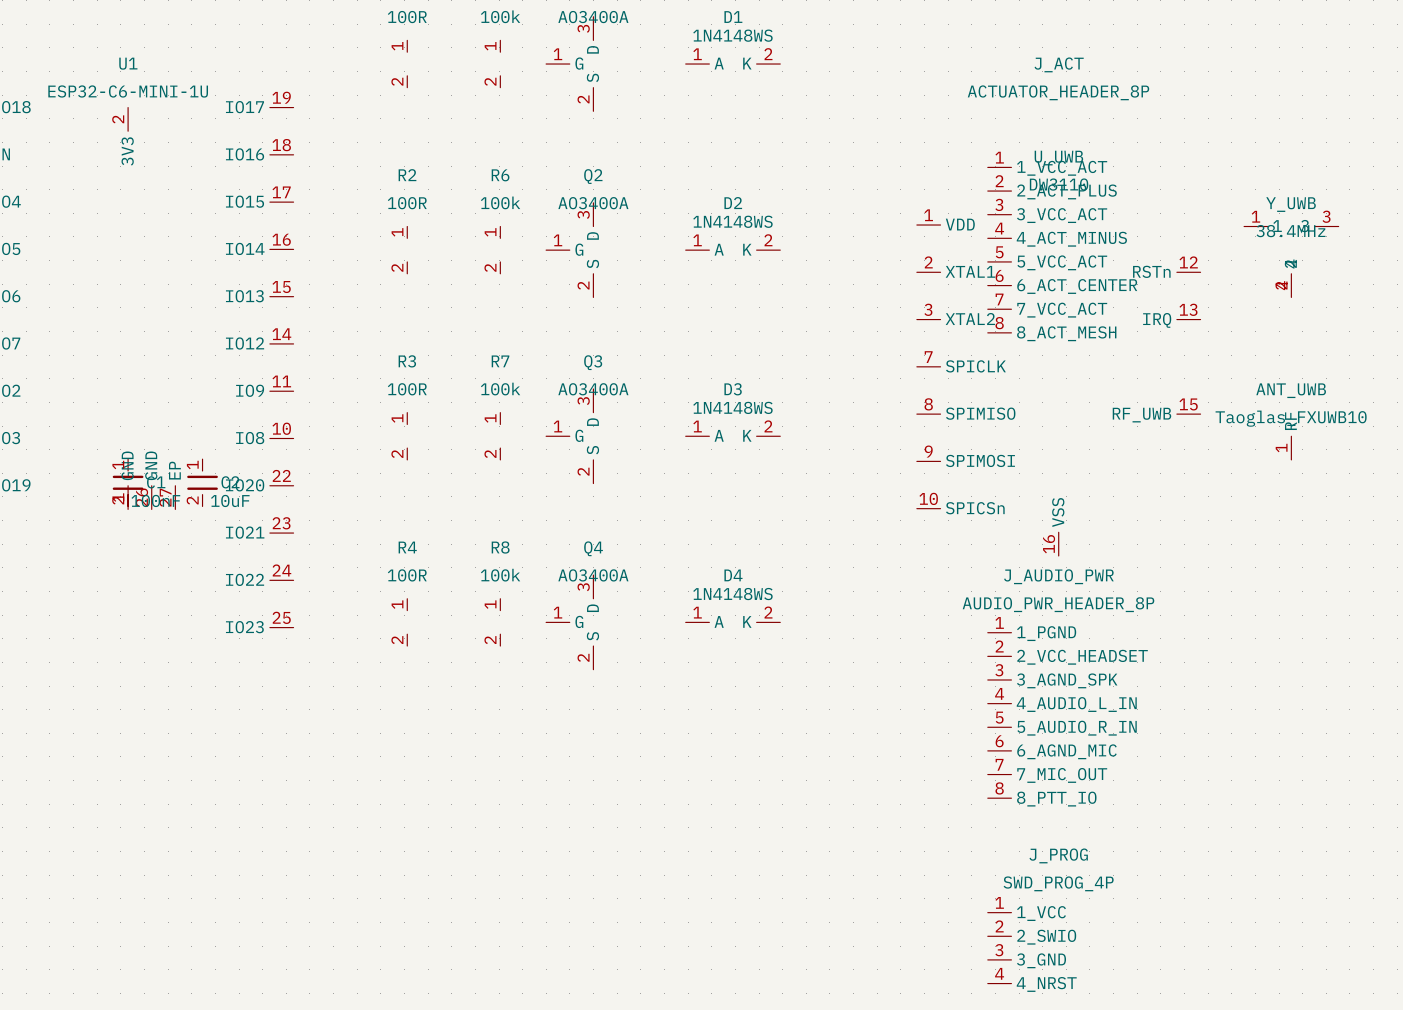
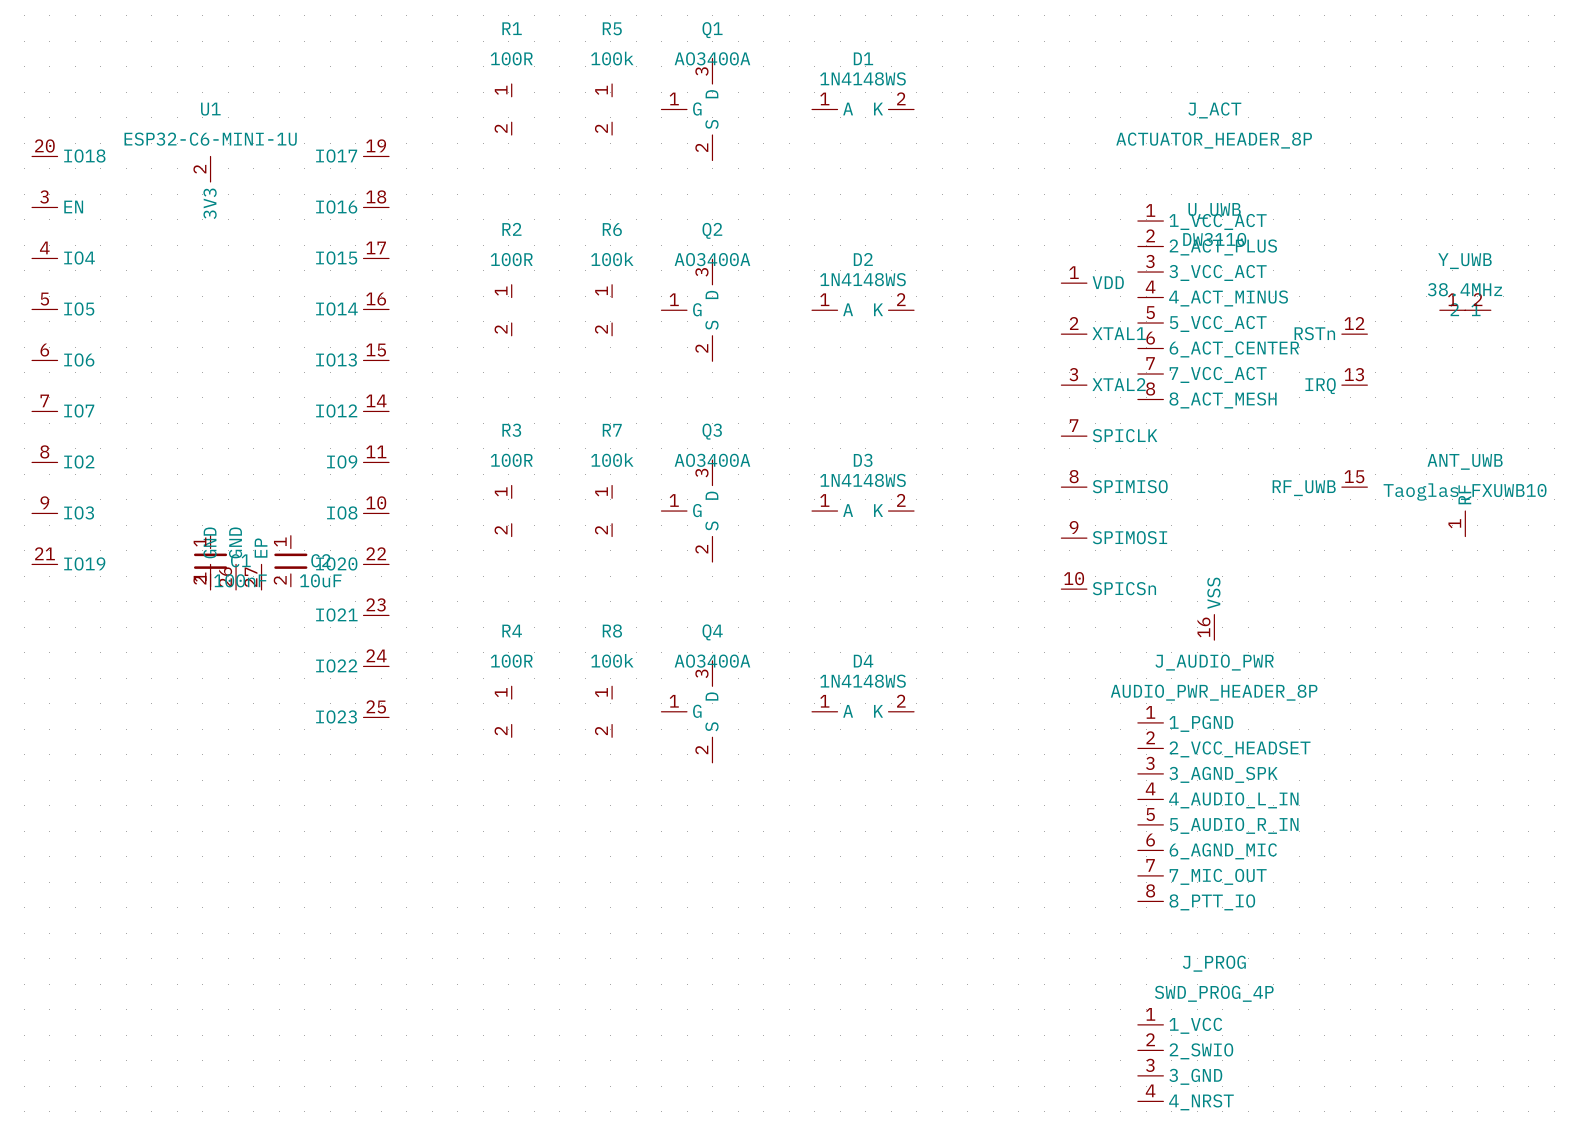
Y_UWB: none -> 38.4MHz (1465, 310)
Y_UWB: 38.4MHz (1291, 261) -> none

